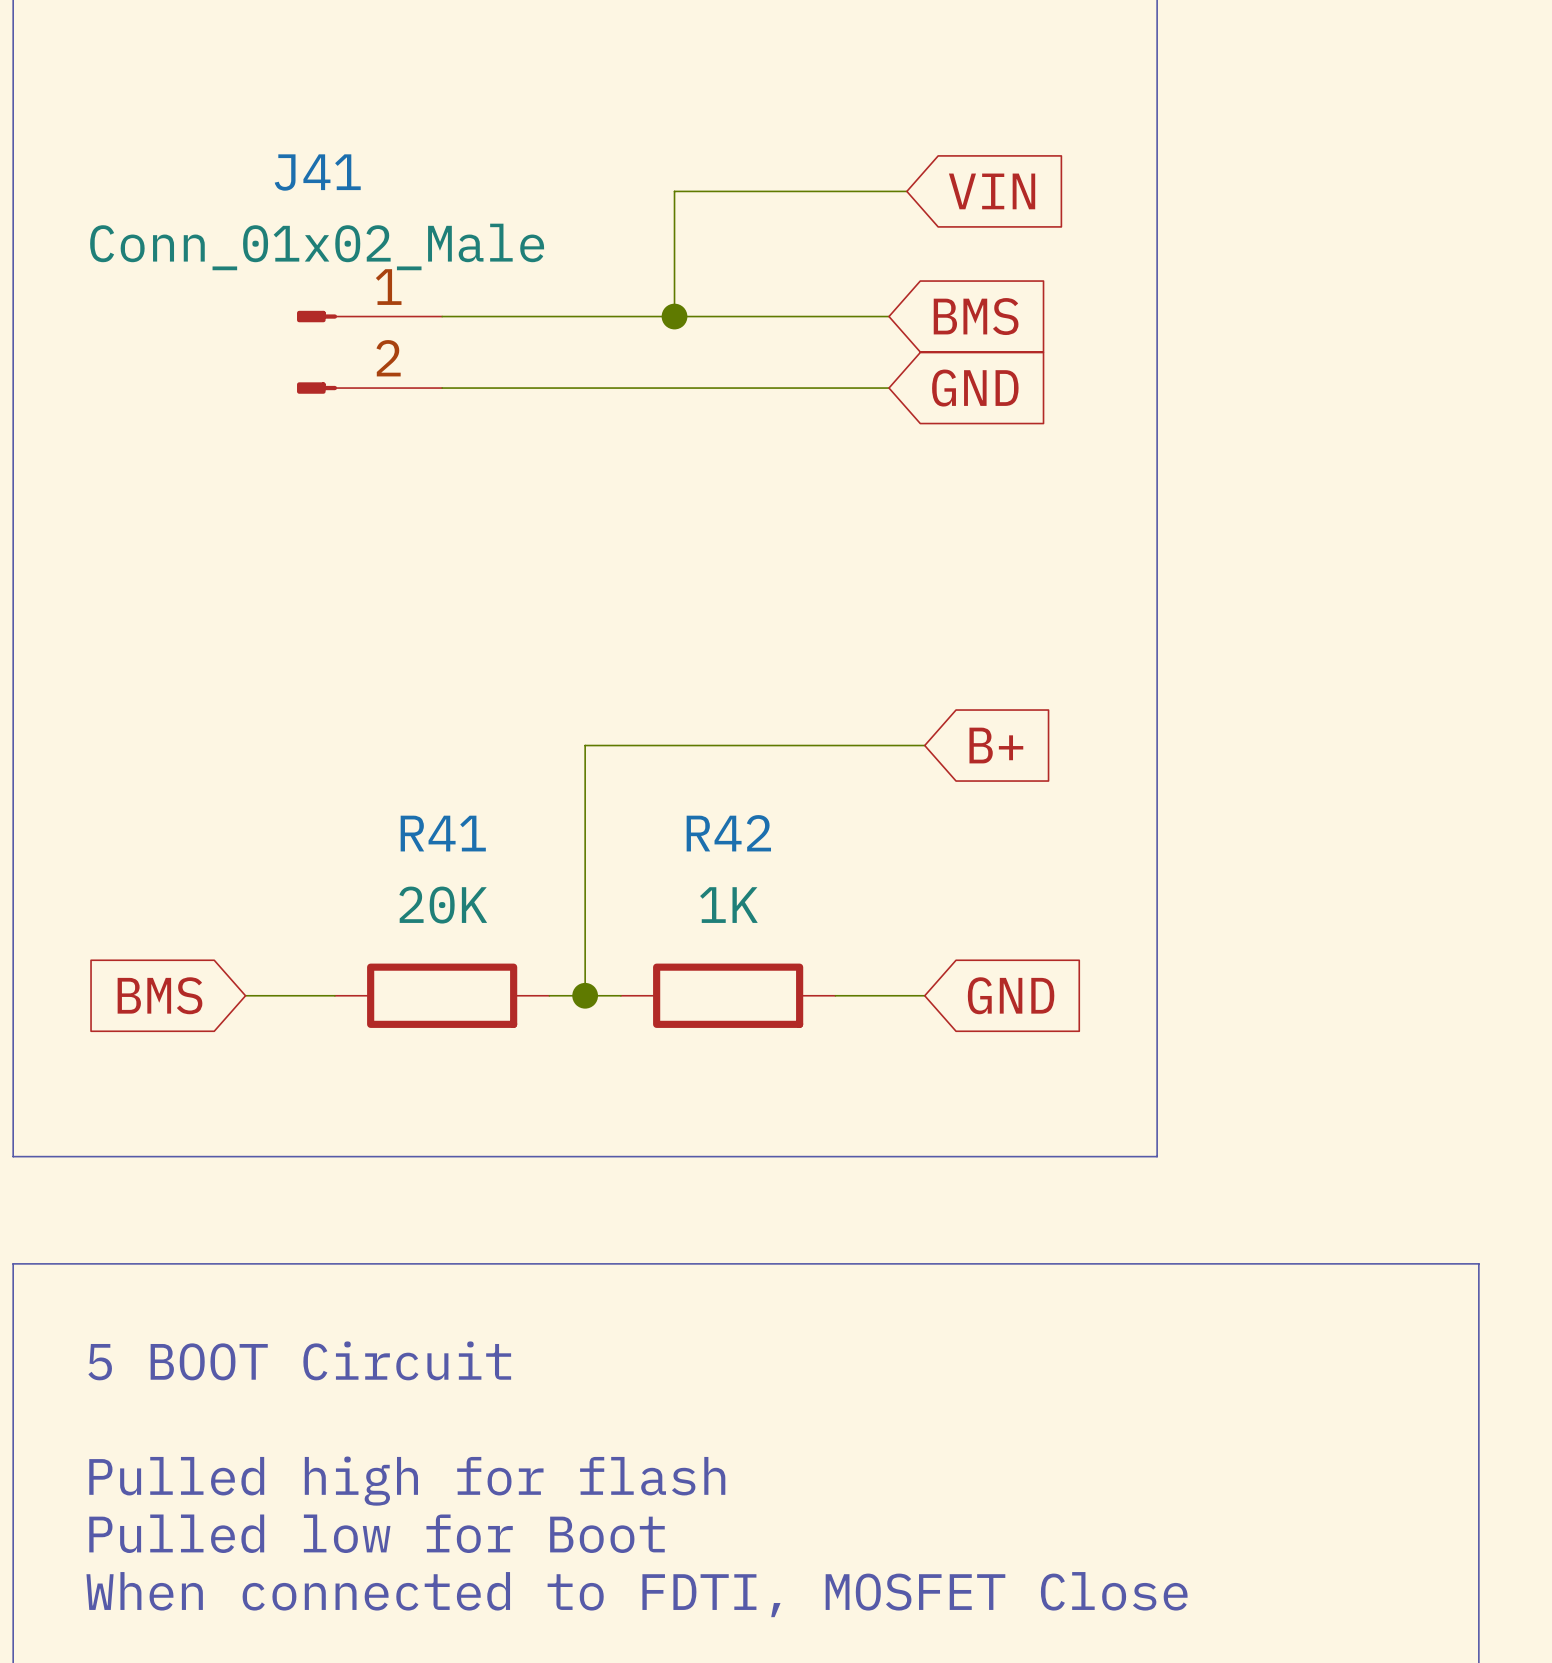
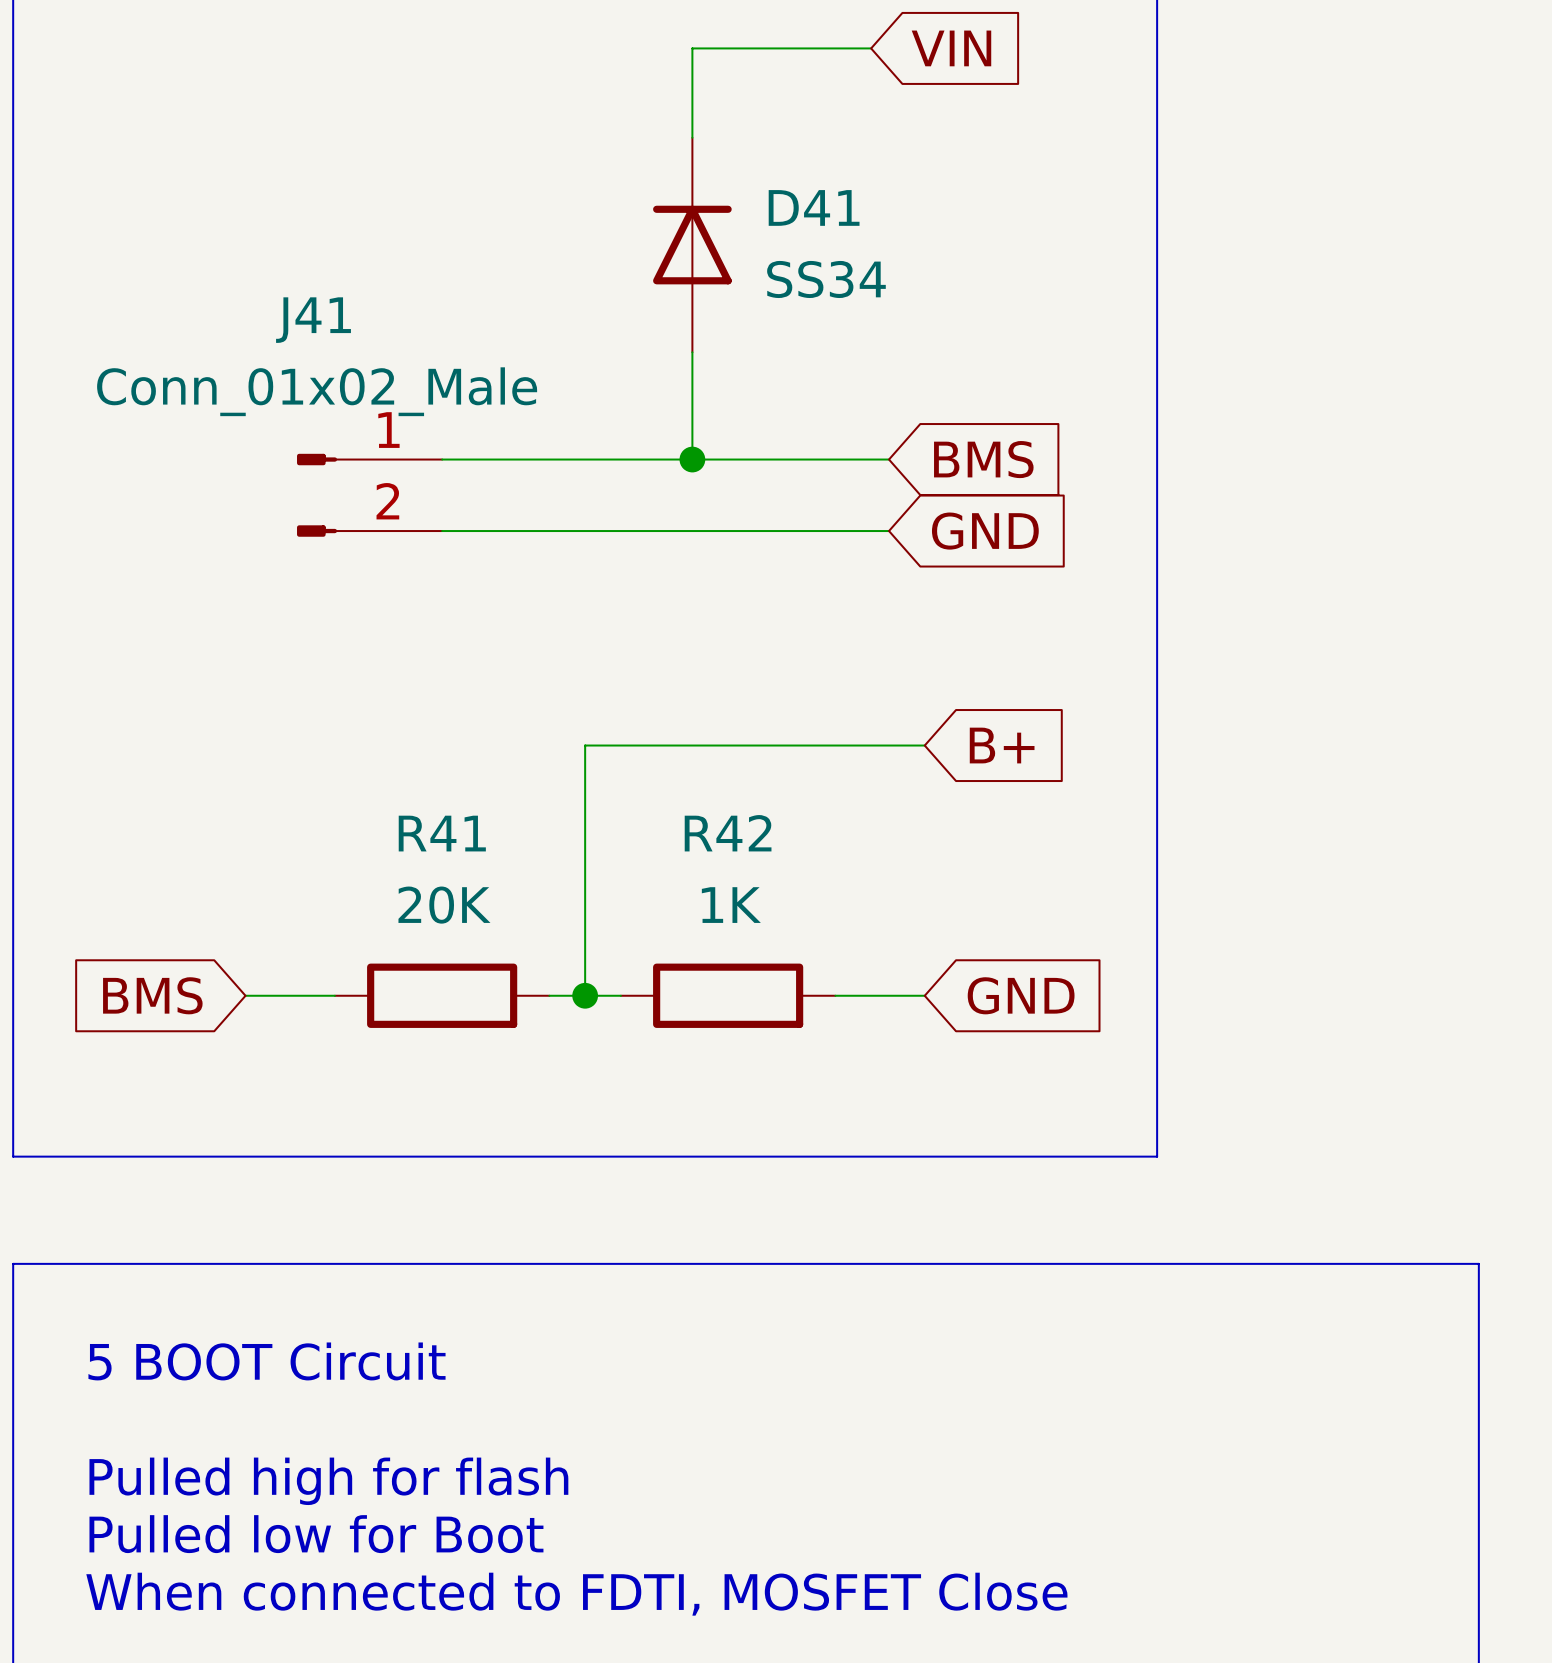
wire: none -> (871, 48) (692, 48) (692, 137)
wire: (906, 191) (674, 191) (674, 316) -> none
global label position: VIN (992, 191) -> VIN (951, 48)
D41: none -> SS34 (692, 245)
wire: (442, 316) (889, 316) -> (442, 459) (889, 459)
junction position: (674, 316) -> (692, 459)
global label position: BMS (976, 316) -> BMS (983, 459)
J41 position: (369, 352) -> (369, 495)
wire: none -> (692, 352) (692, 459)
wire: (442, 388) (889, 388) -> (442, 531) (889, 531)
global label position: GND (975, 388) -> GND (985, 531)

